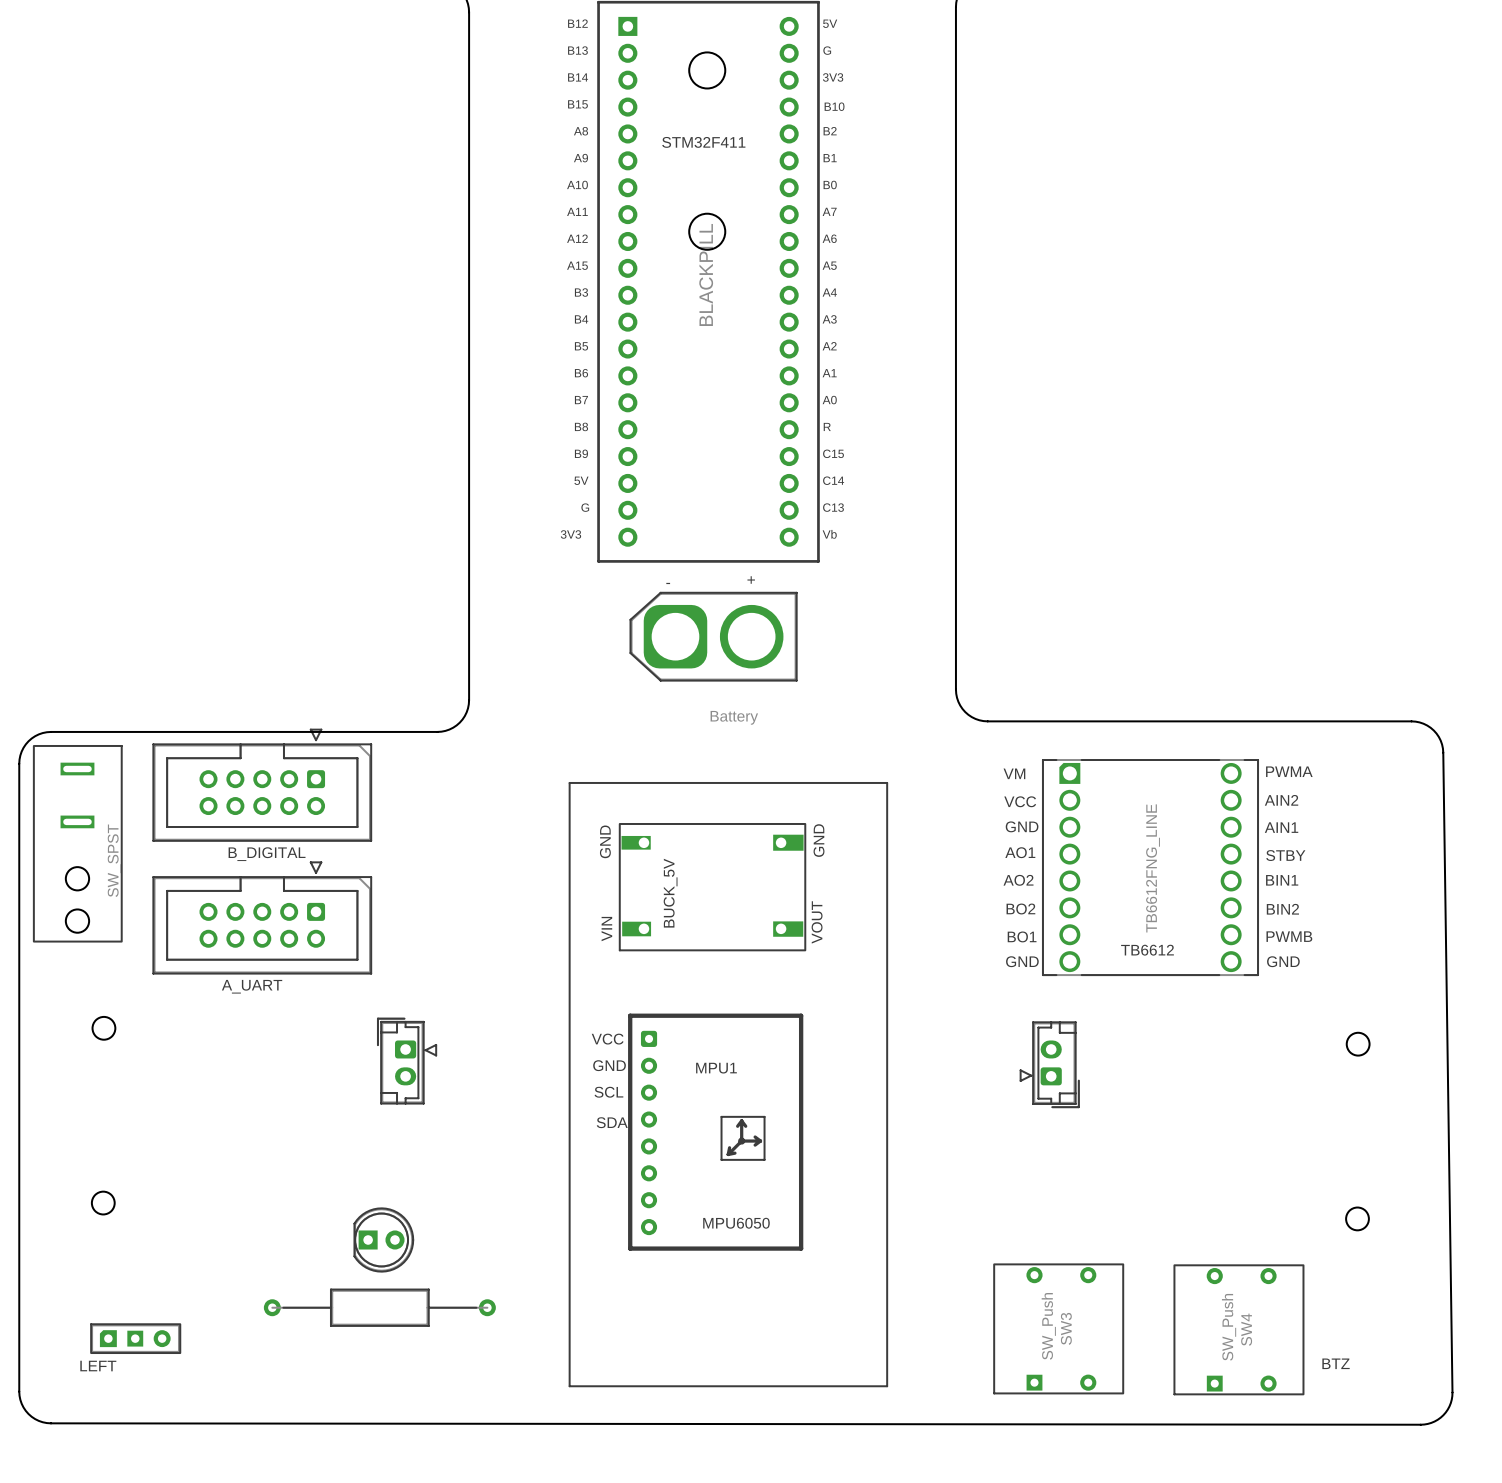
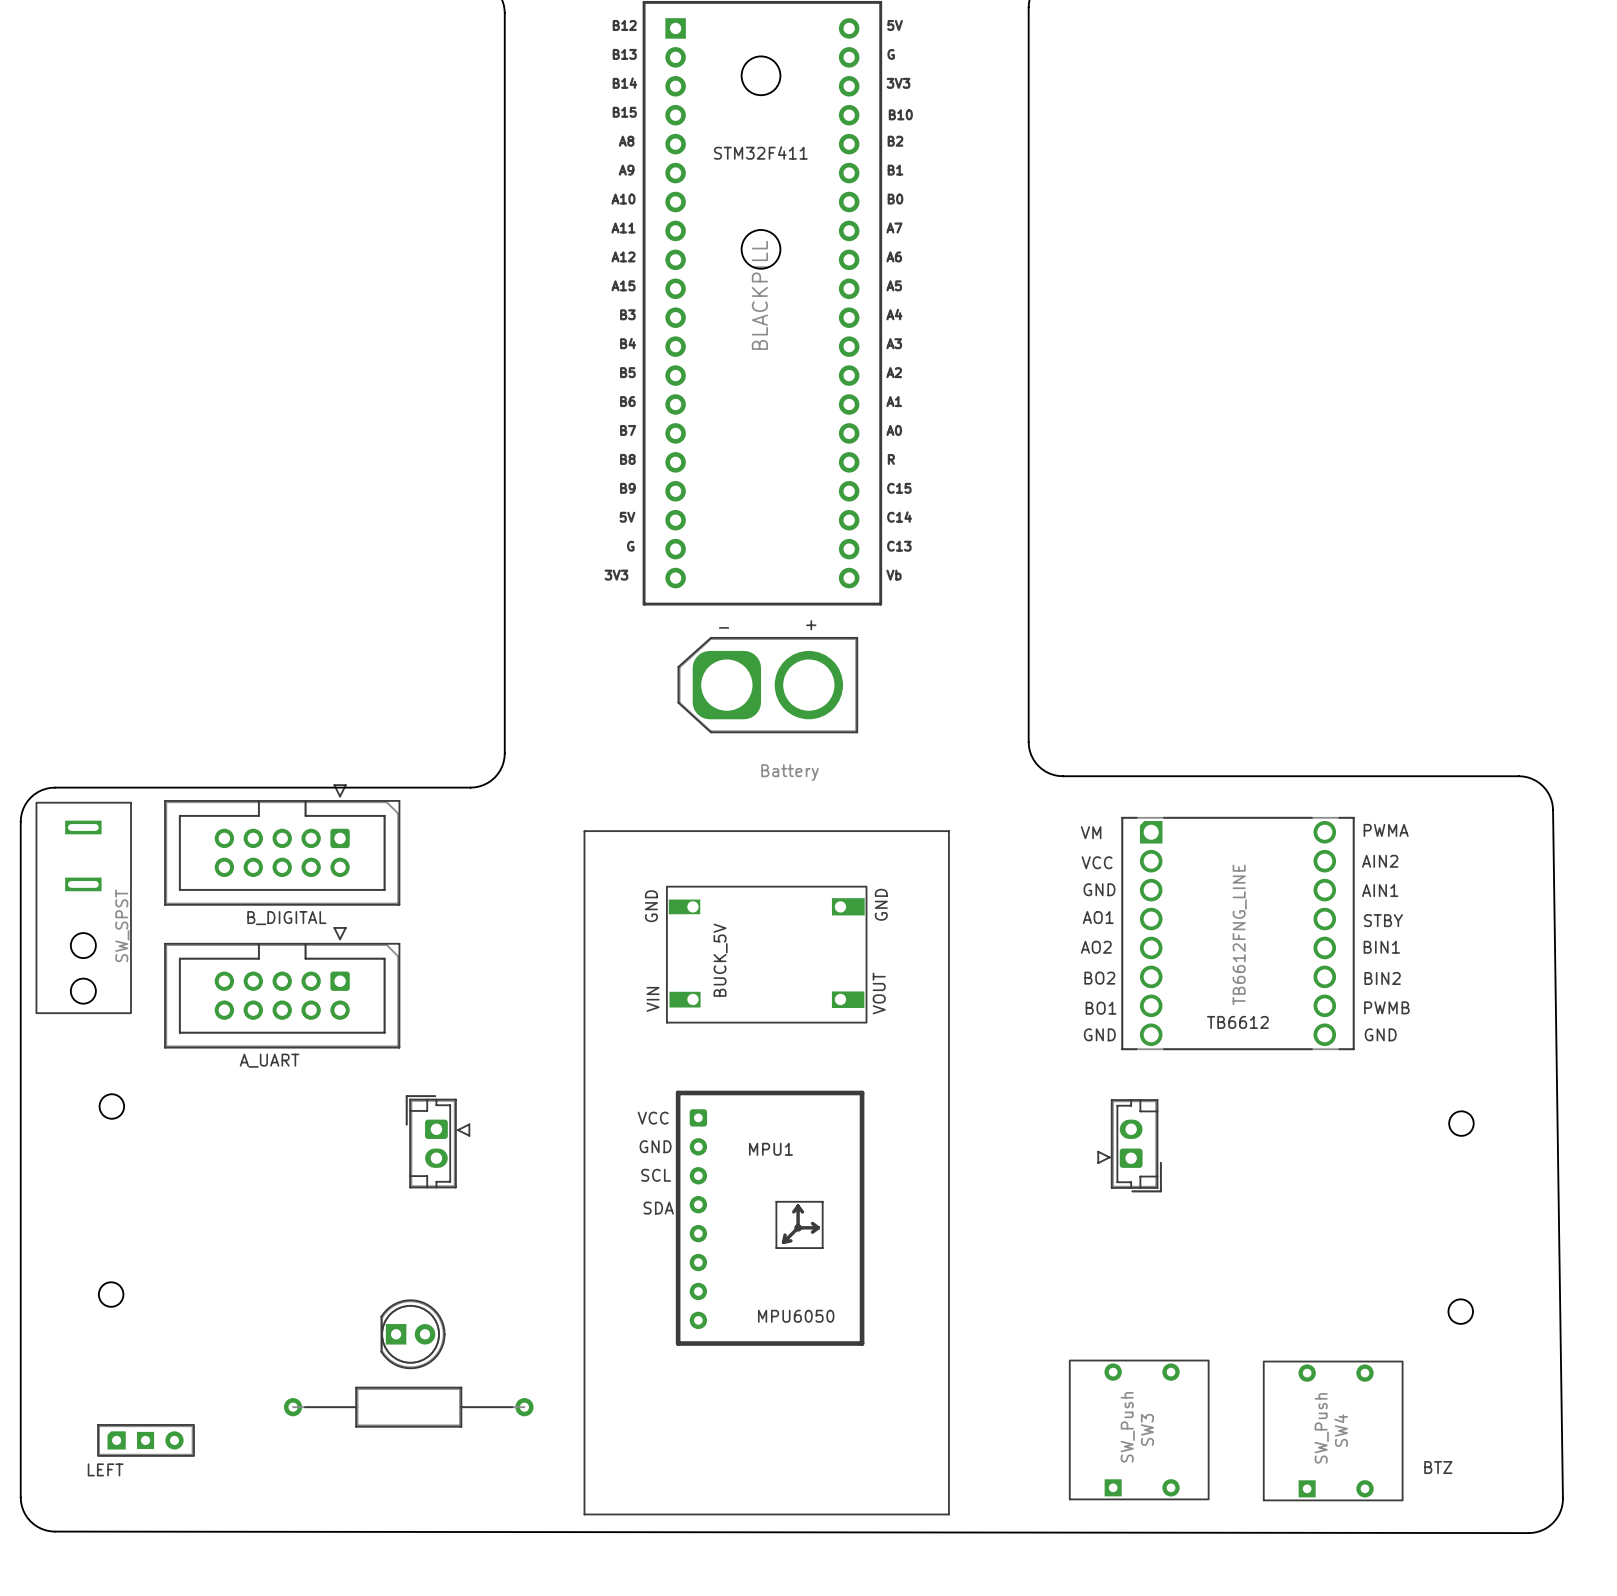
line: (569, 782) (887, 782) (887, 1386) (569, 1386) (569, 782) -> (584, 831) (584, 1514) (948, 1514) (948, 831) (584, 831)

